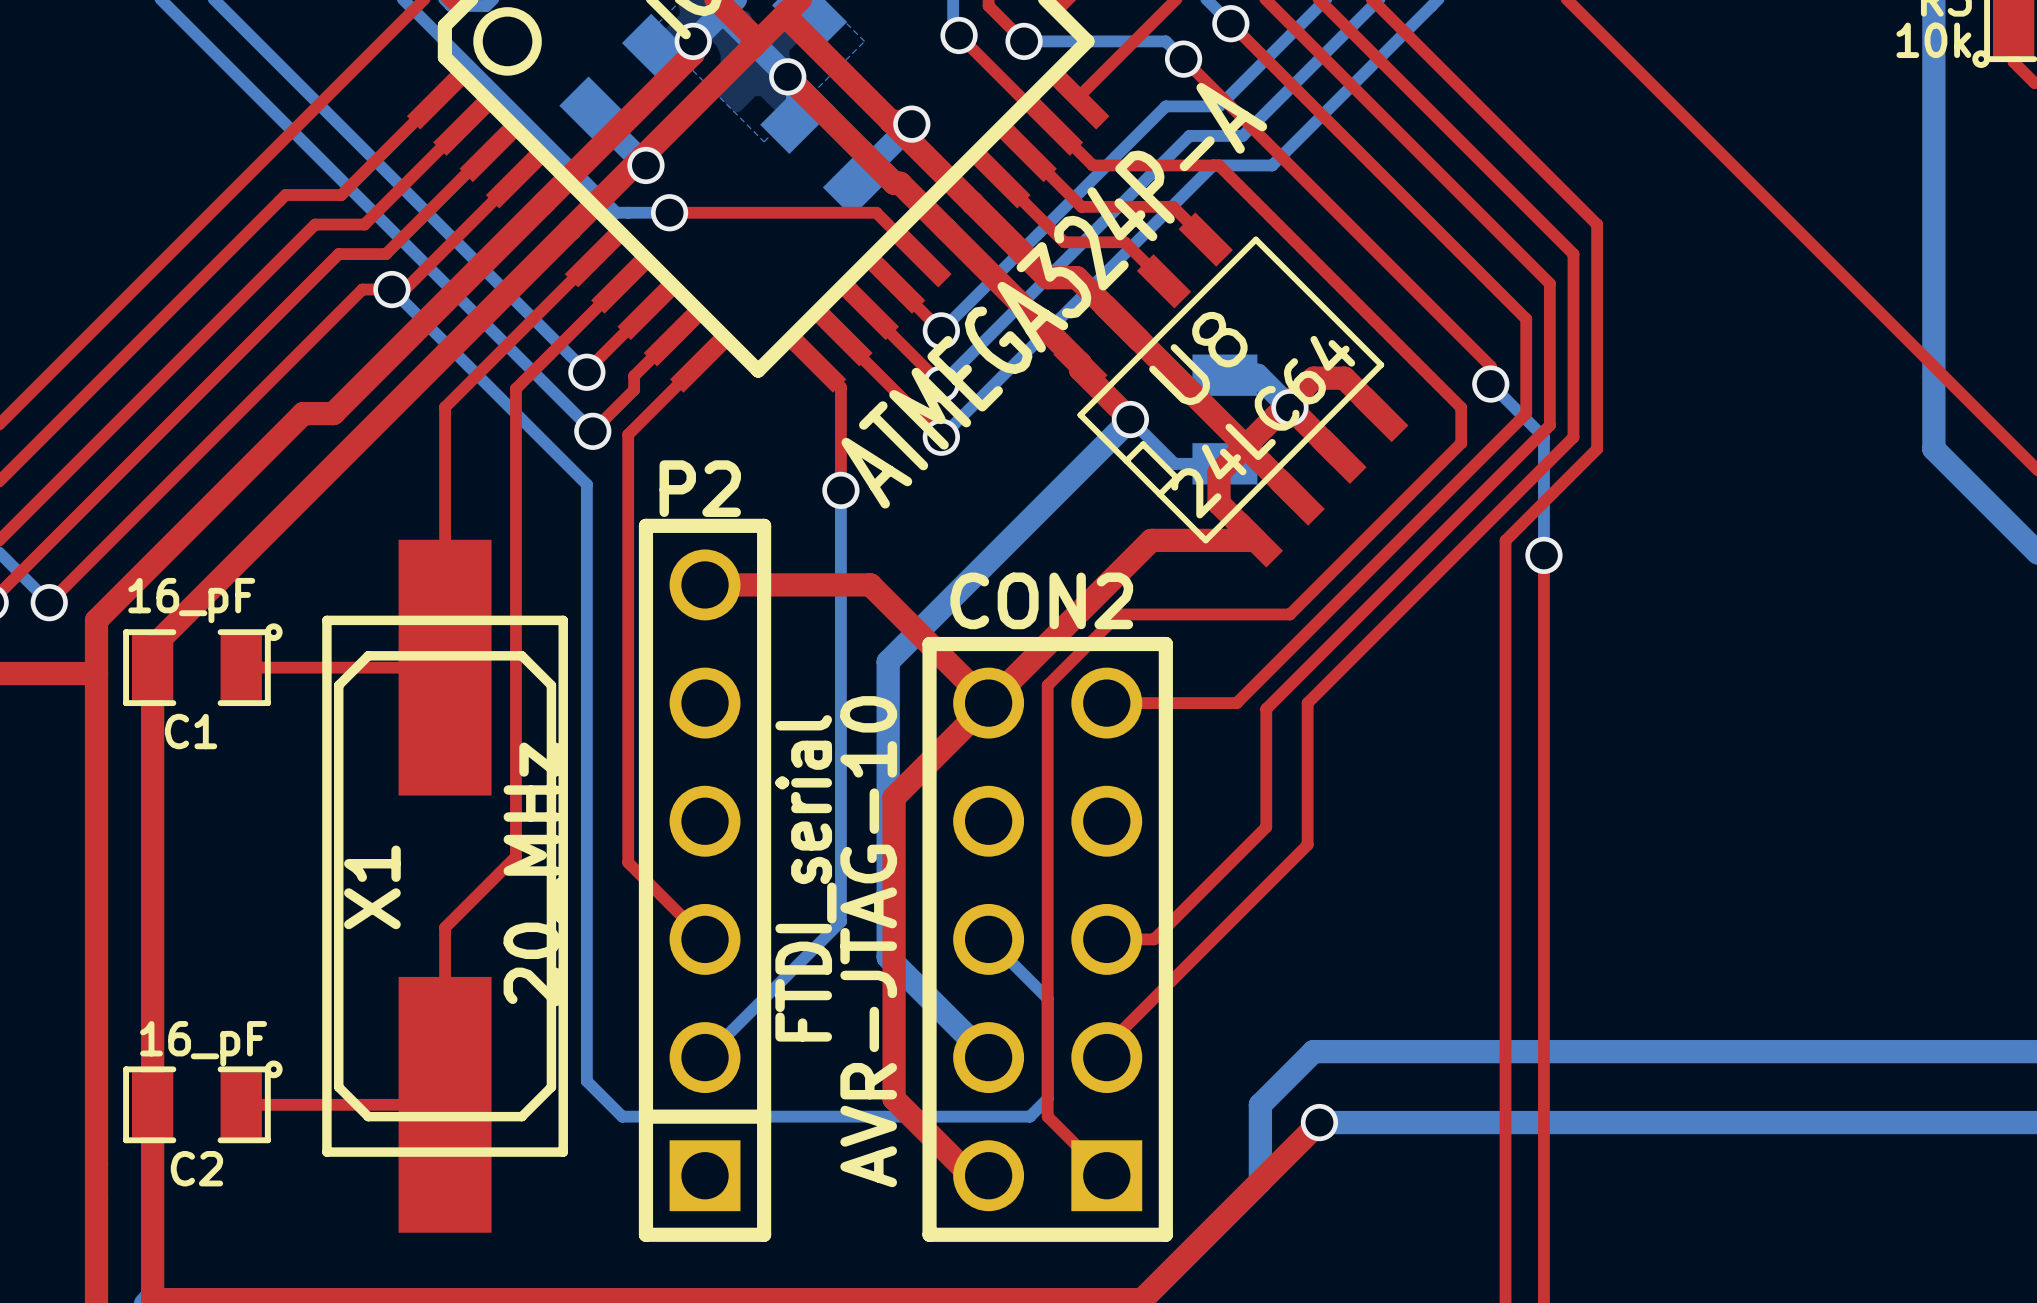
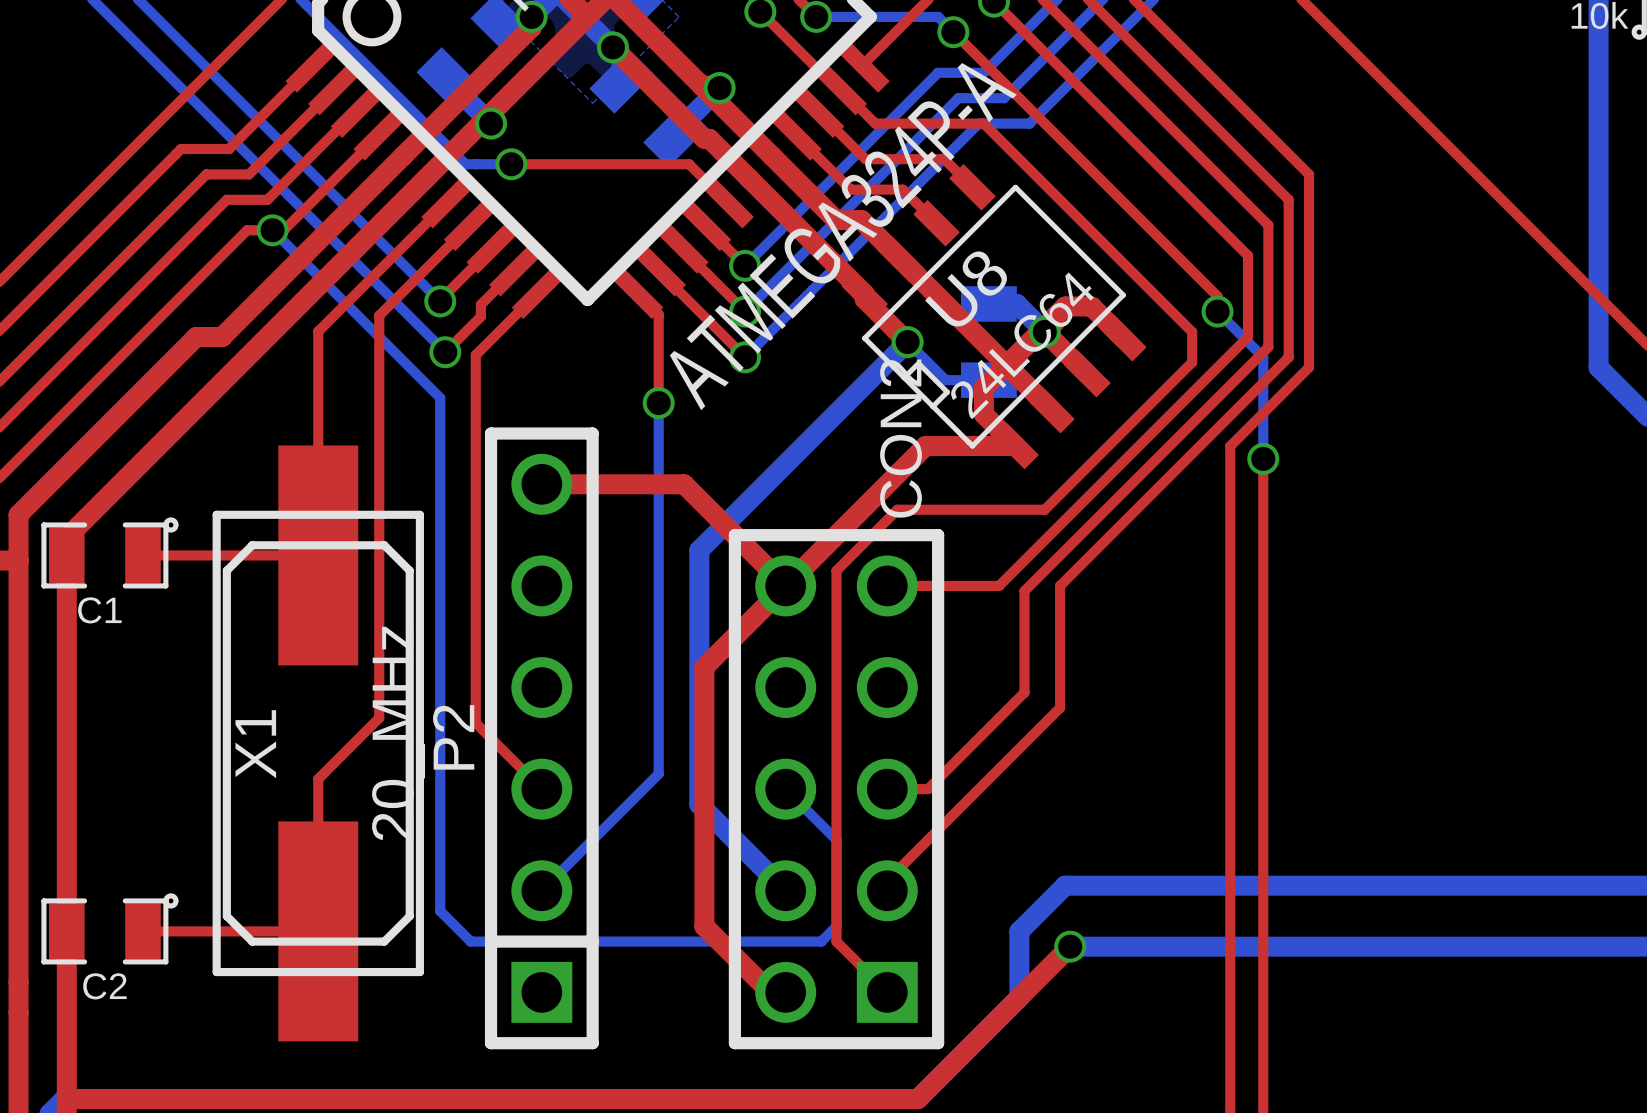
P2 name rotation: 0° (700, 488) -> 90° counterclockwise (453, 737)
P2 name position: P2 (700, 488) -> P2 (453, 737)
C1 value: 16_pF (191, 600) -> none
CON2 name rotation: 0° (1041, 600) -> 90° counterclockwise (901, 438)
P2 value: FTDI_serial (805, 878) -> none
CON2 value: AVR-JTAG-10 (868, 941) -> none
C2 value: 16_pF (203, 1043) -> none

